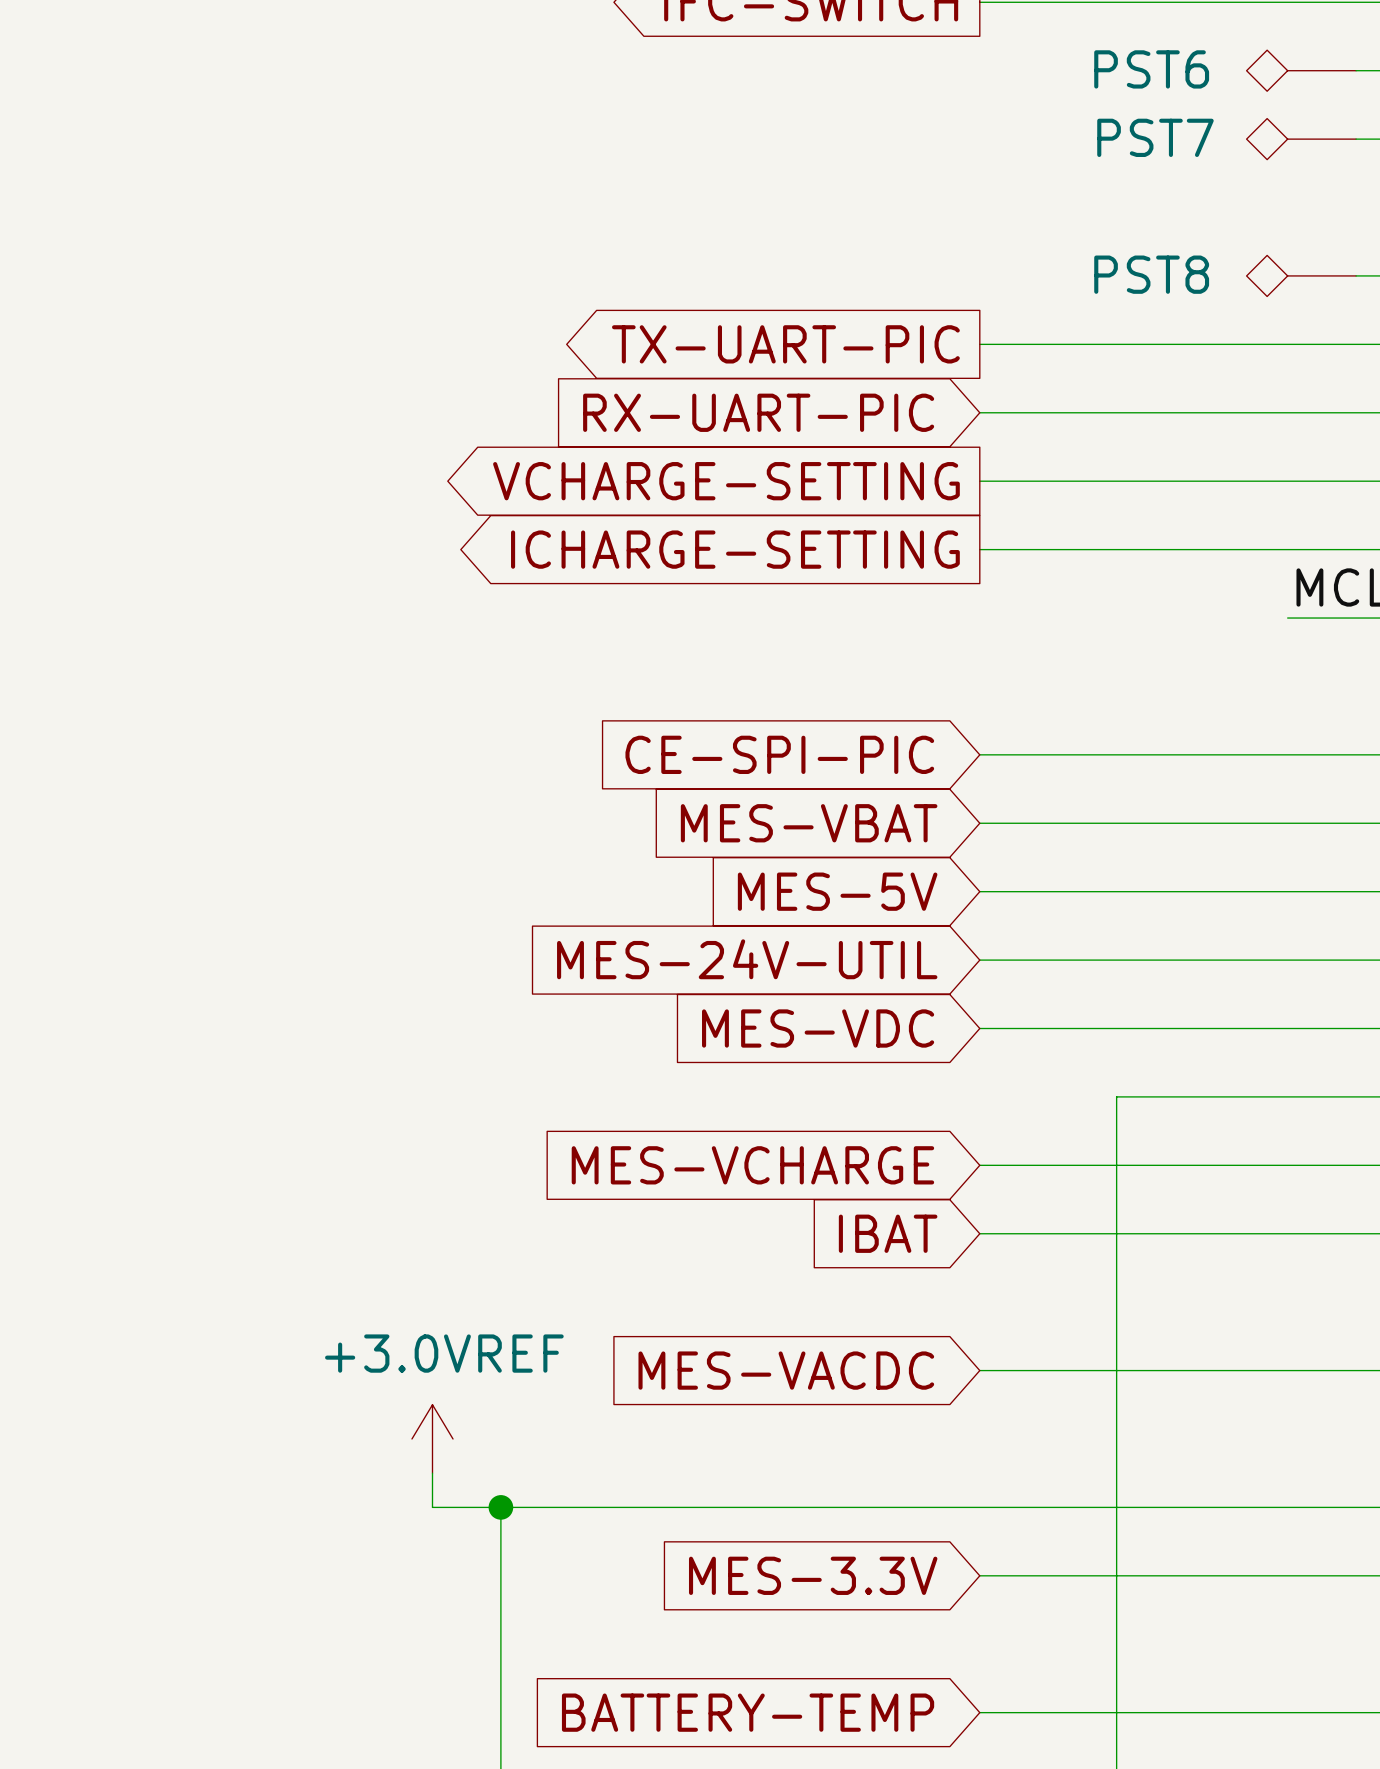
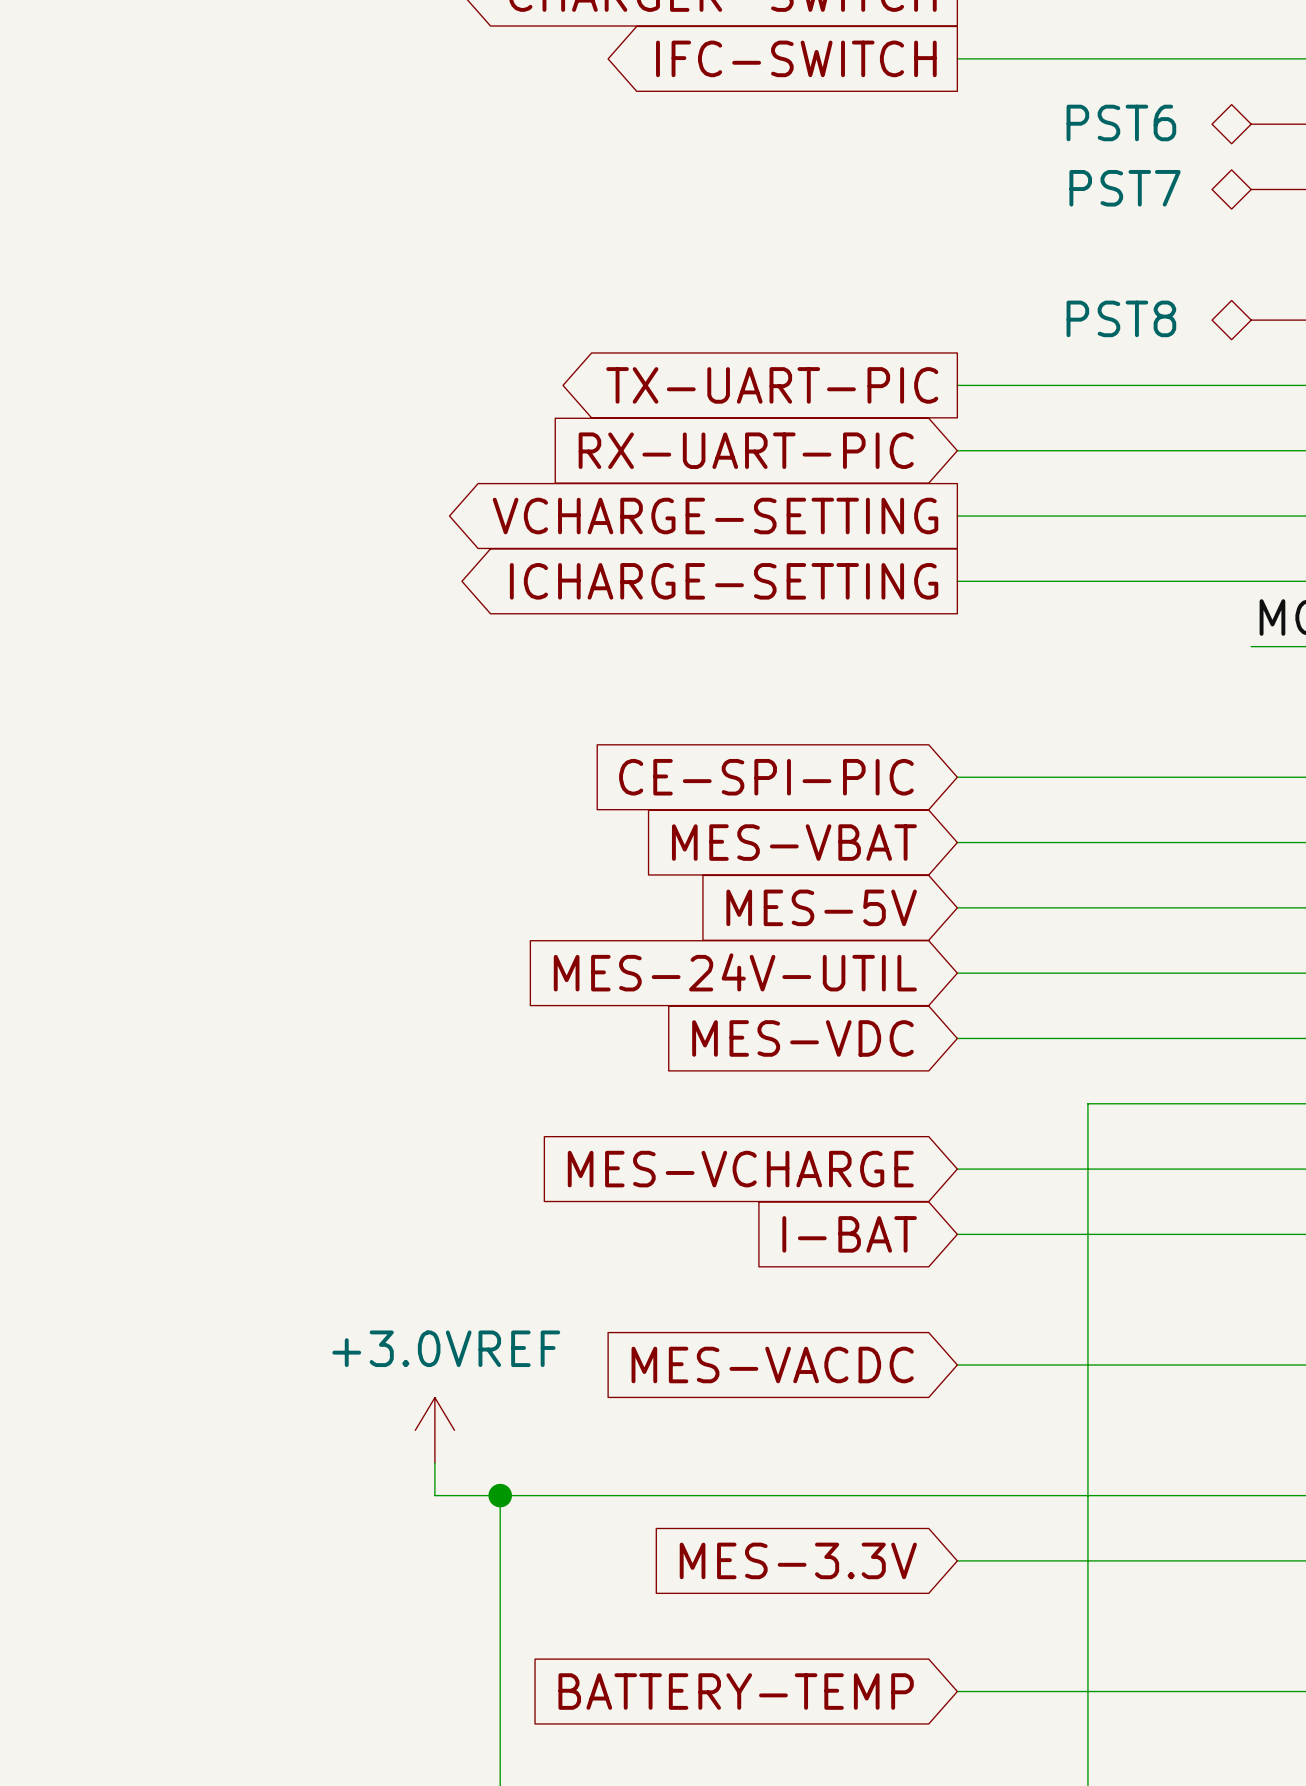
global label: IBAT (888, 1233) -> I-BAT (849, 1234)

